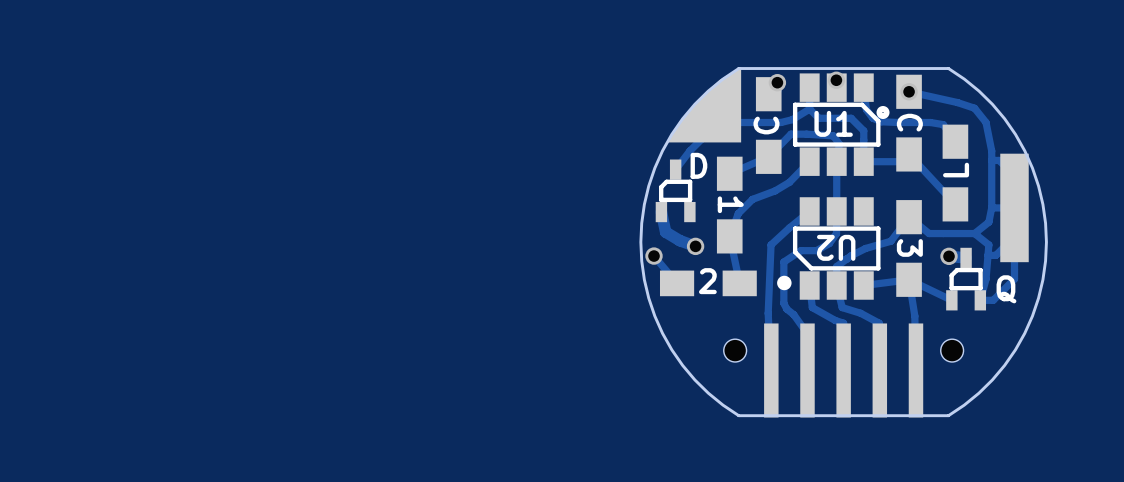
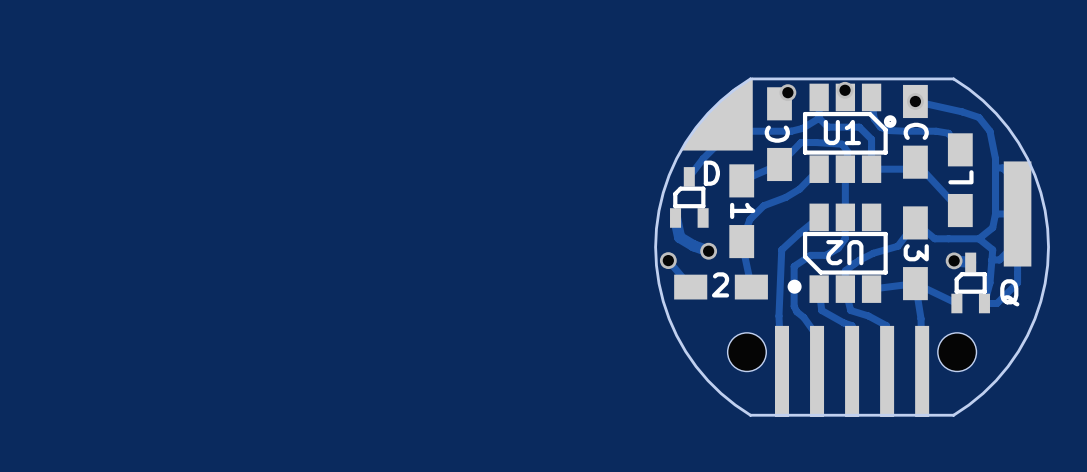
part footprint: [723, 339, 747, 362] -> [727, 332, 767, 372]
part footprint: [940, 339, 964, 362] -> [937, 332, 977, 372]

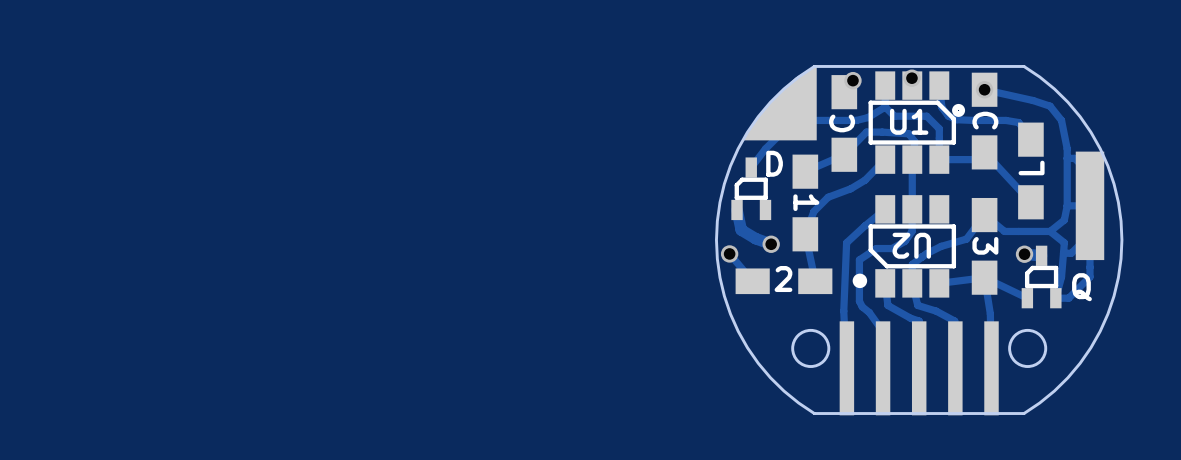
round board edge: none -> [791, 328, 831, 368]
round board edge: none -> [1008, 328, 1048, 368]
part: (746, 352) -> none
part: (957, 352) -> none

